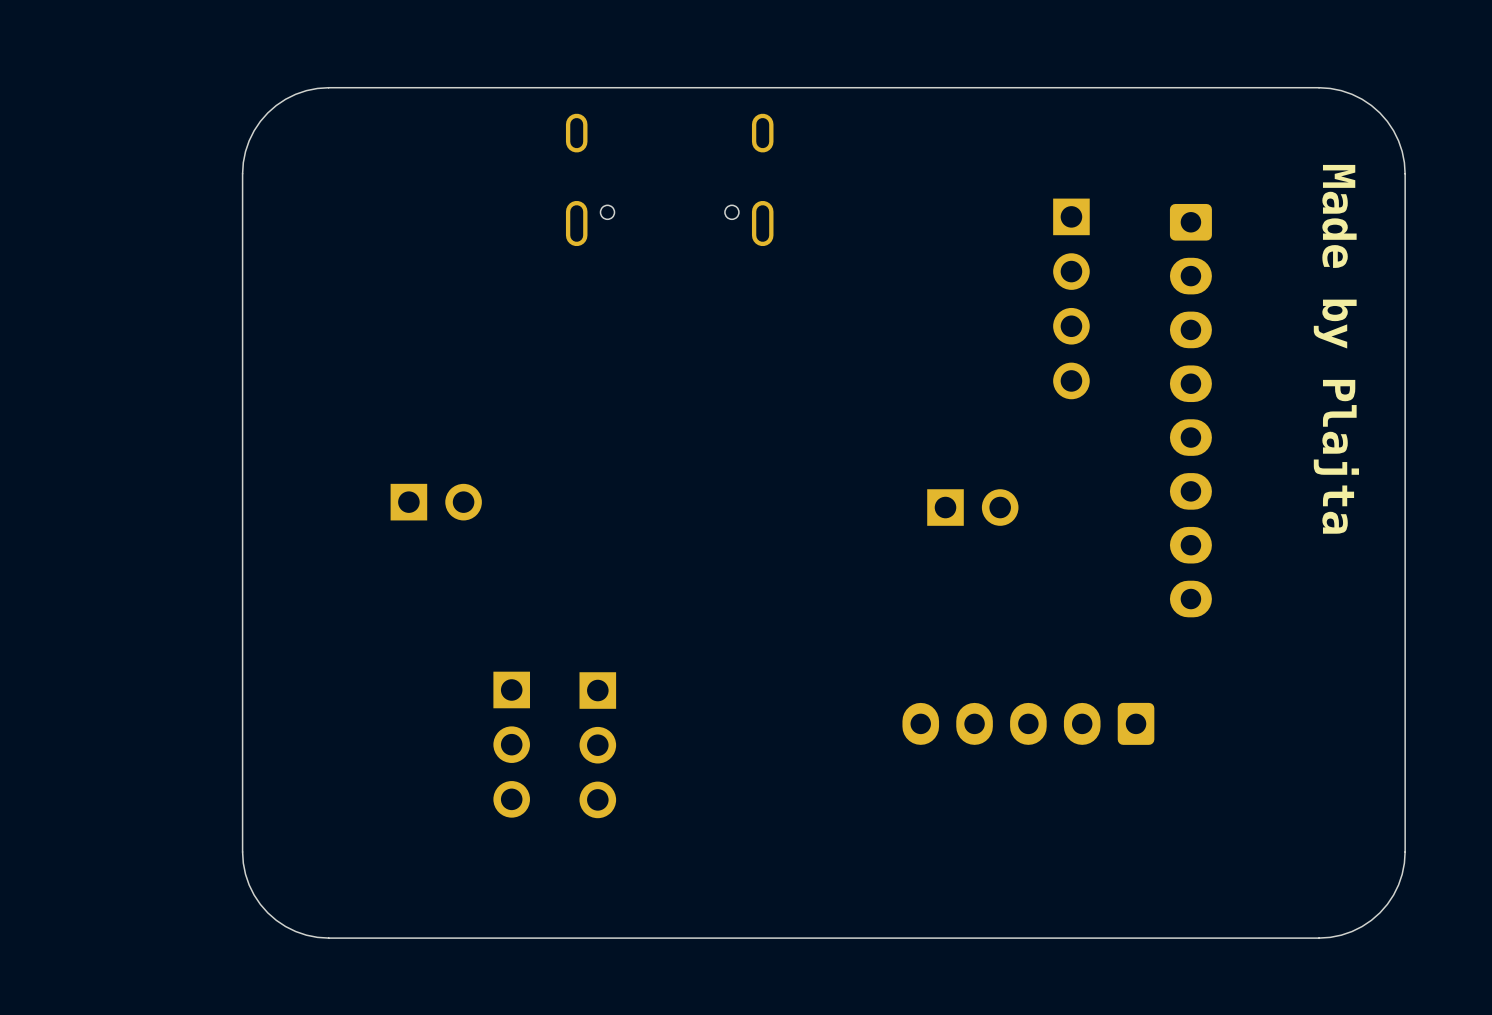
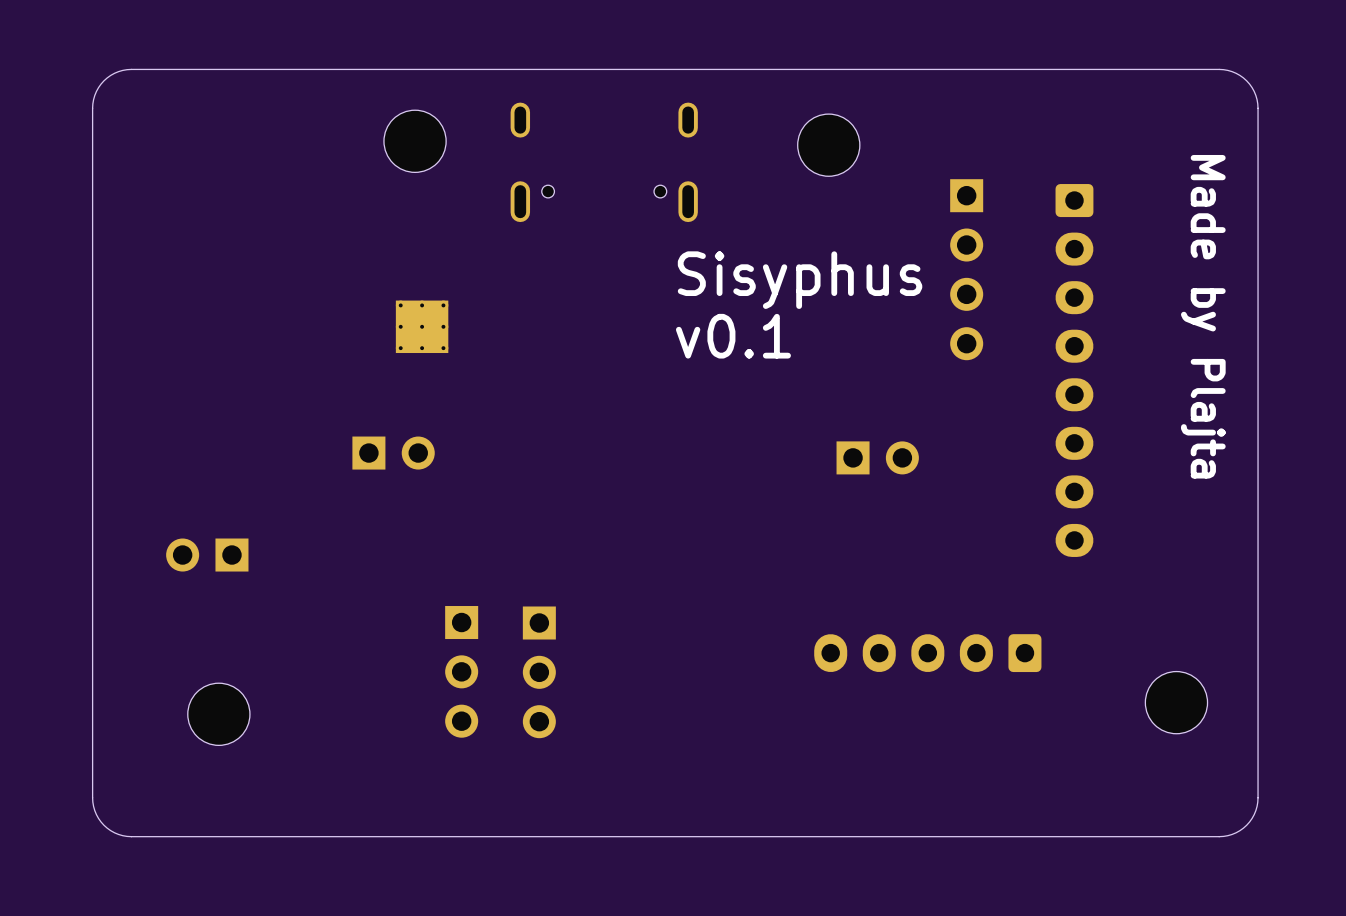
board edge: (1319, 87) (328, 87) (306, 90) (276, 105) (254, 130) (245, 151) (242, 173) (242, 851) (249, 884) (260, 904) (285, 926) (306, 935) (328, 938) (1319, 938) (1351, 931) (1371, 920) (1387, 904) (1398, 884) (1405, 851) (1405, 173) (1398, 140) (1379, 112) (1351, 94) (1319, 87) -> (1219, 69) (1232, 71) (1246, 80) (1255, 95) (1258, 108) (1258, 797) (1252, 818) (1239, 830) (1219, 836) (131, 836) (114, 832) (98, 818) (92, 797) (92, 108) (98, 87) (110, 75) (131, 69) (1219, 69)
part: none -> (415, 141)
part: none -> (828, 145)
text: none -> Sisyphus (800, 280)
part: none -> (422, 326)
text: none -> v0.1 (733, 336)
part: none -> (207, 555)
part: none -> (1176, 702)
part: none -> (218, 714)

